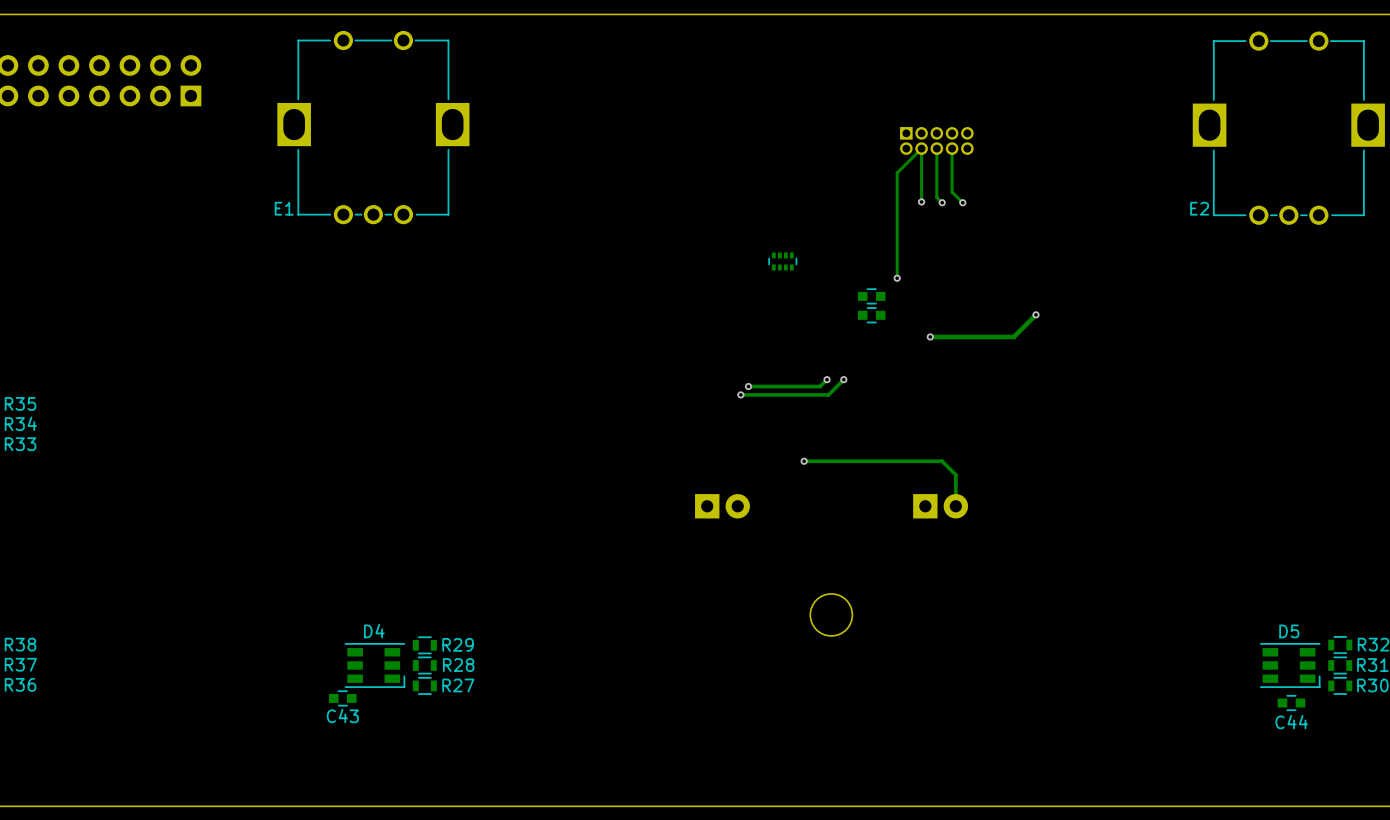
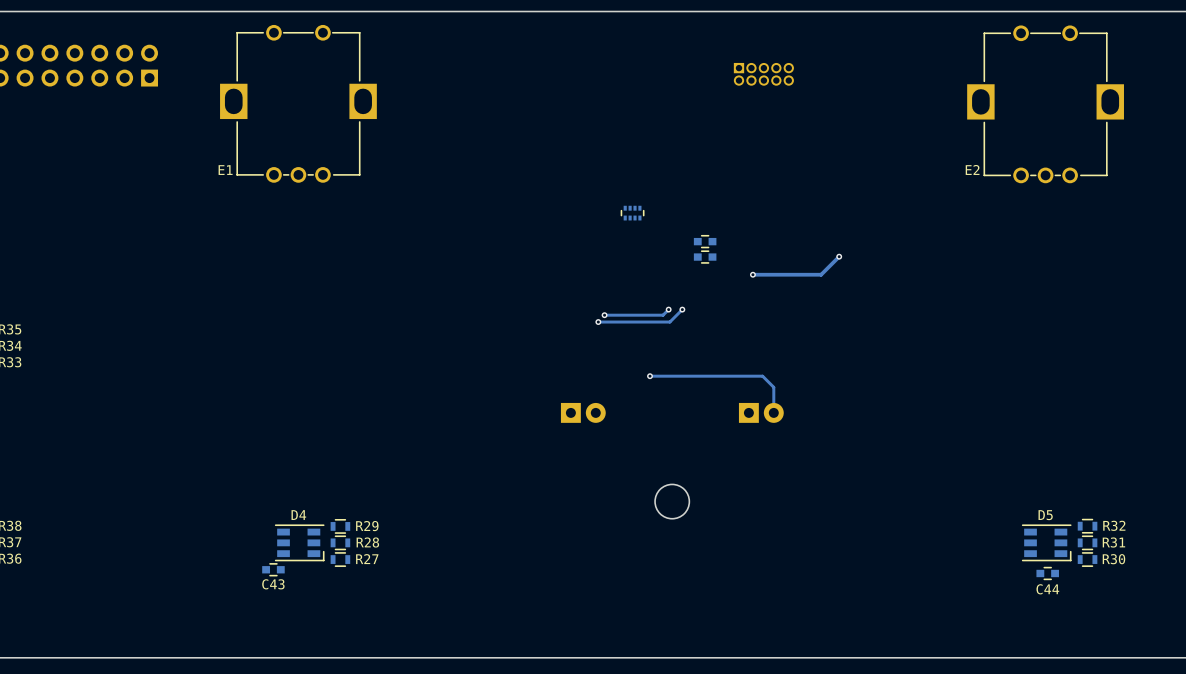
part position: (936, 140) -> (763, 74)
track: (936, 148) (936, 197) (942, 202) -> none
track: (952, 148) (952, 192) (962, 202) -> none
track: (921, 201) (921, 148) (897, 173) (897, 278) -> none
via: (921, 201) -> none
via: (942, 202) -> none
via: (962, 202) -> none
via: (897, 278) -> none

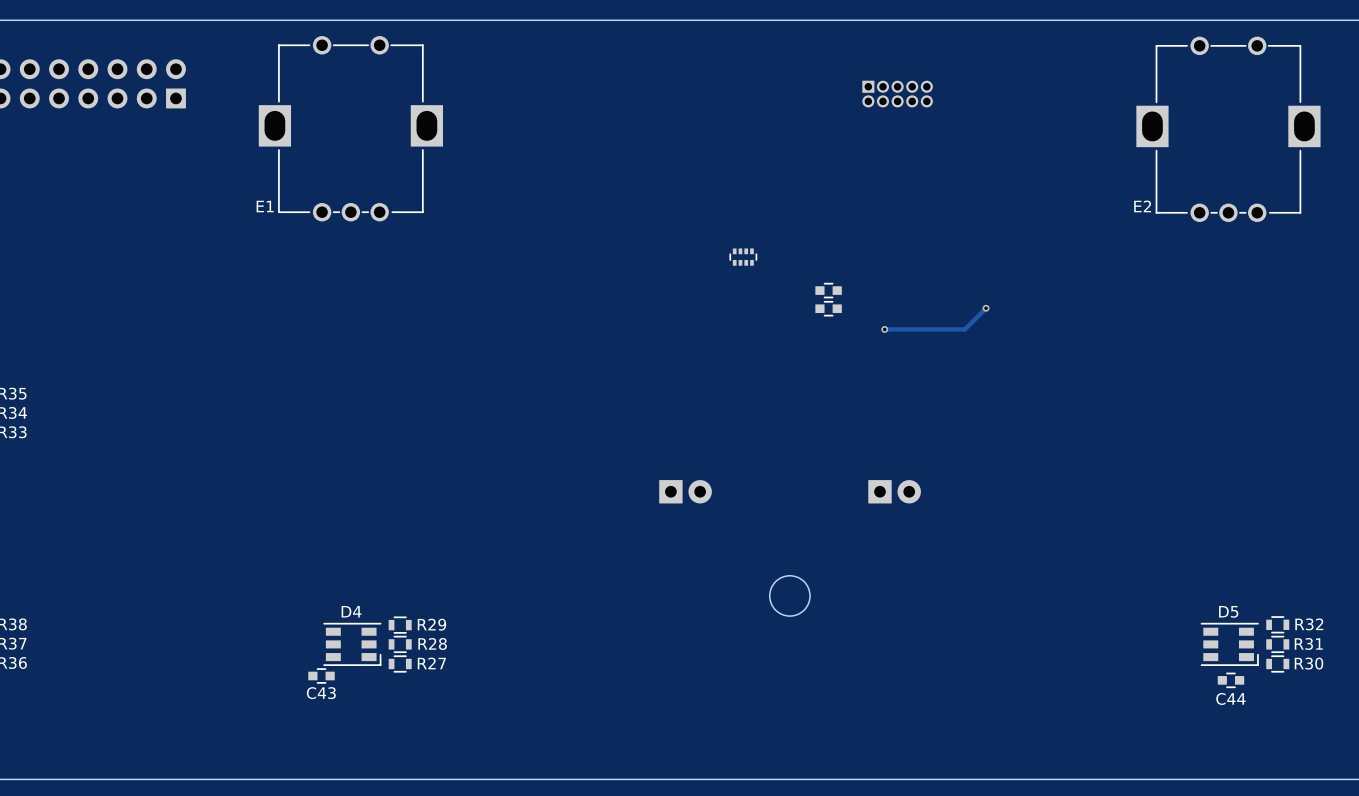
track: (668, 309) (663, 315) (604, 315) -> none
via: (668, 309) -> none
track: (682, 309) (669, 322) (598, 322) -> none
via: (682, 309) -> none
via: (604, 315) -> none
via: (598, 322) -> none
track: (650, 376) (762, 376) (773, 387) (773, 412) -> none
via: (650, 376) -> none

